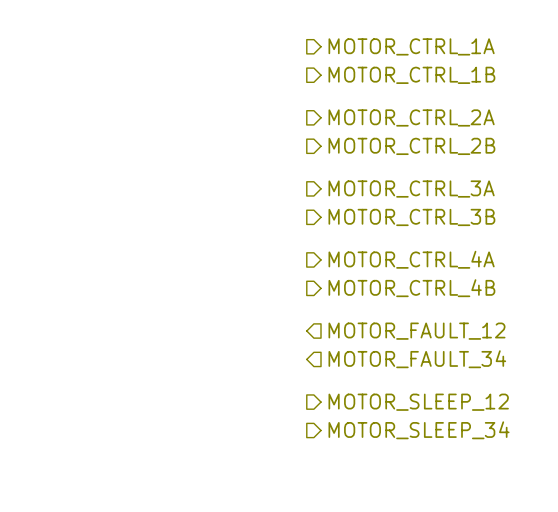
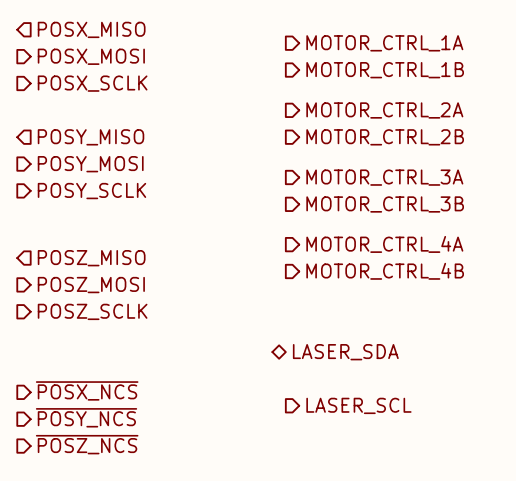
hierarchical label: none -> POSX_MISO (91, 29)
hierarchical label: none -> POSX_MOSI (91, 56)
hierarchical label: none -> POSX_SCLK (92, 83)
hierarchical label: none -> POSY_MISO (91, 137)
hierarchical label: none -> POSY_MOSI (90, 164)
hierarchical label: none -> POSY_SCLK (91, 191)
hierarchical label: none -> POSZ_MISO (91, 258)
hierarchical label: none -> POSZ_MOSI (91, 285)
hierarchical label: none -> POSZ_SCLK (92, 311)
hierarchical label: MOTOR_FAULT_12 (416, 331) -> none
hierarchical label: MOTOR_FAULT_34 (417, 359) -> none
hierarchical label: none -> LASER_SDA (345, 352)
hierarchical label: MOTOR_SLEEP_12 (418, 402) -> none
hierarchical label: none -> ~{POSX_NCS} (87, 390)
hierarchical label: MOTOR_SLEEP_34 (419, 430) -> LASER_SCL (358, 405)
hierarchical label: none -> ~{POSY_NCS} (86, 417)
hierarchical label: none -> ~{POSZ_NCS} (87, 444)

